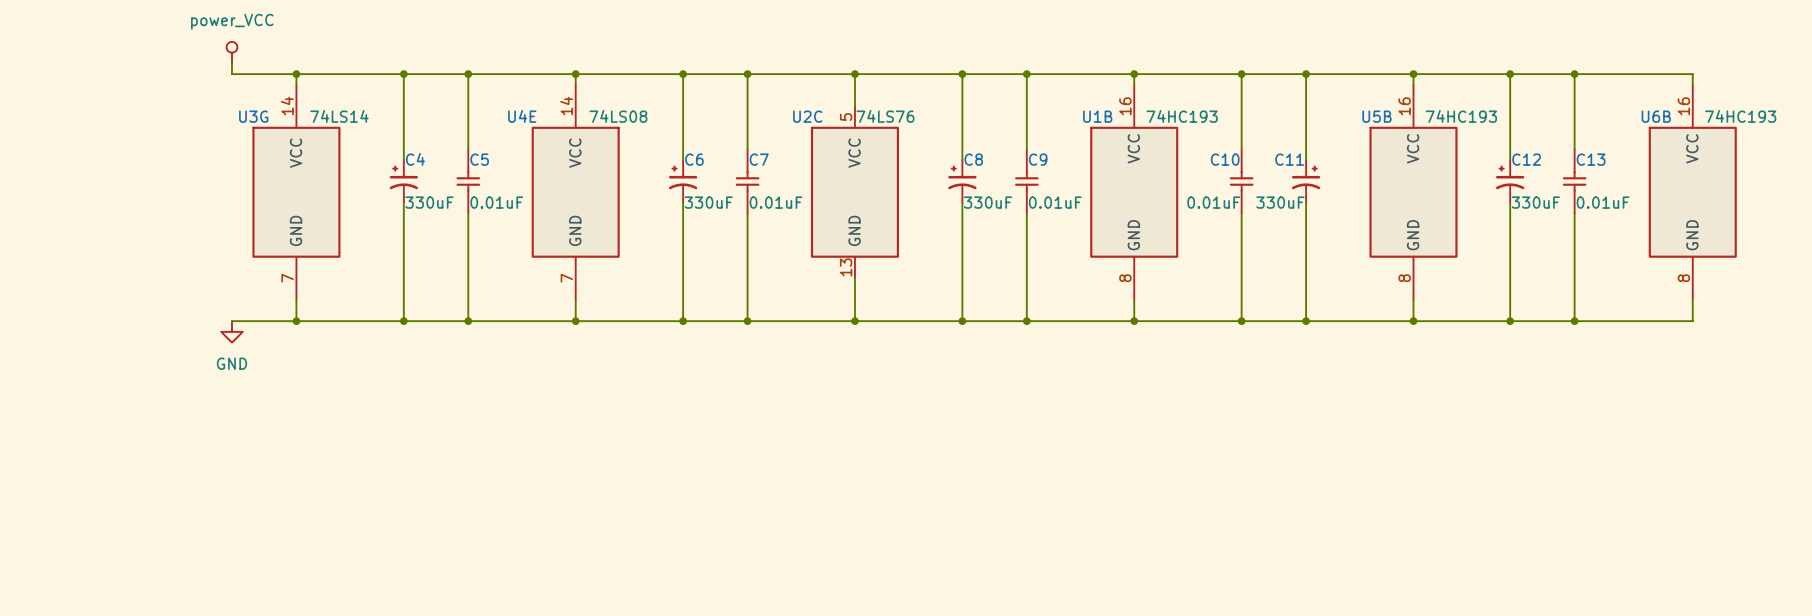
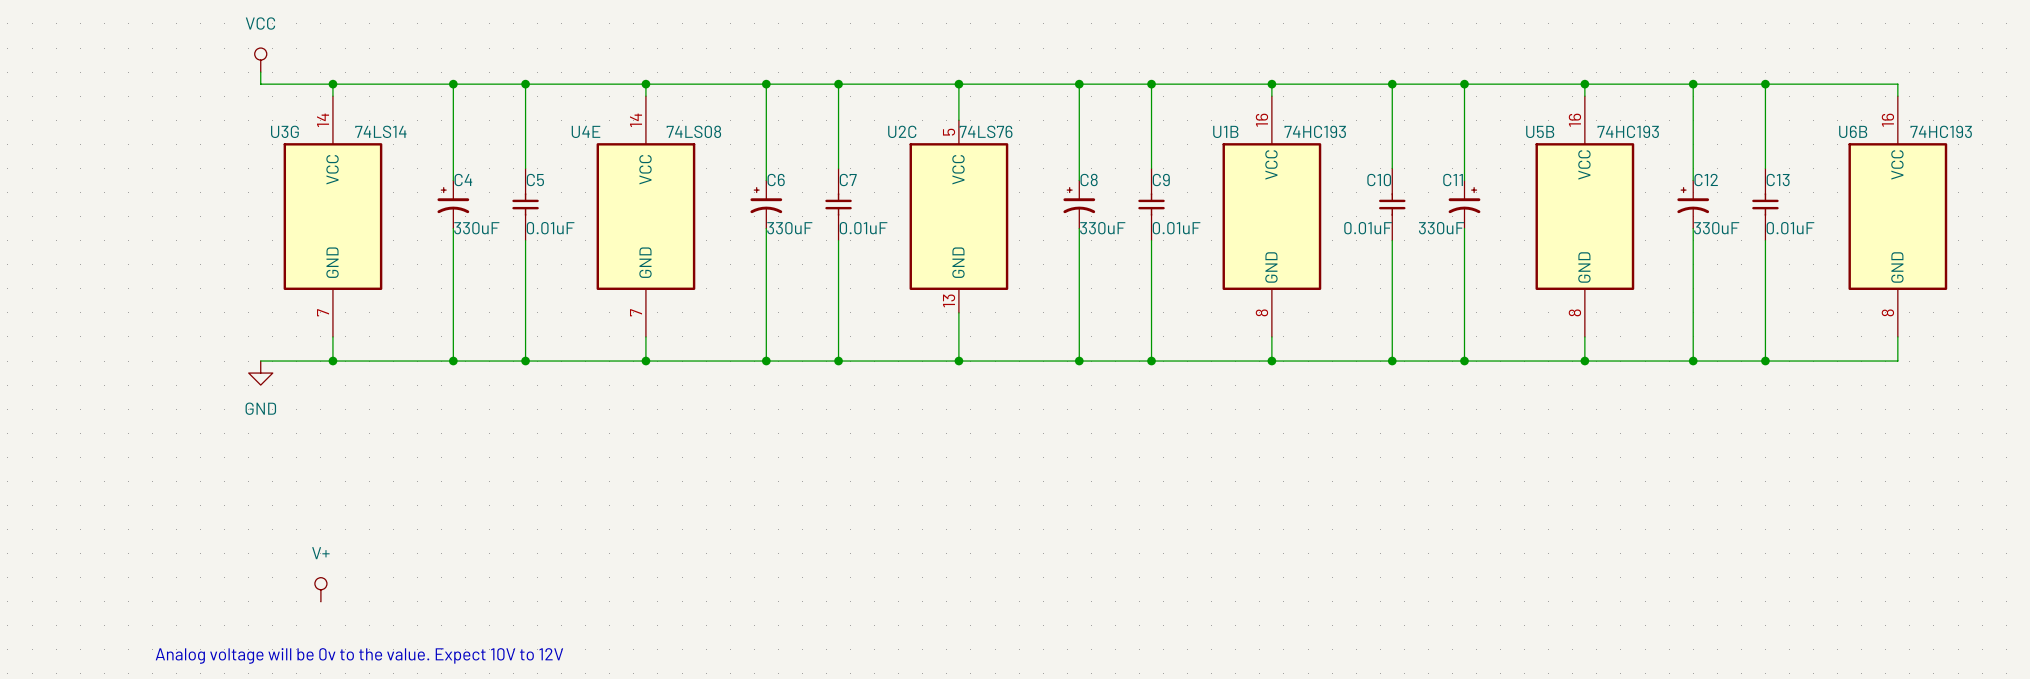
power symbol: power_VCC (231, 52) -> VCC (260, 60)
power symbol: none -> V+ (320, 589)
text: none -> Analog voltage will be 0v to the value. Expect 10V to 12V (359, 655)

